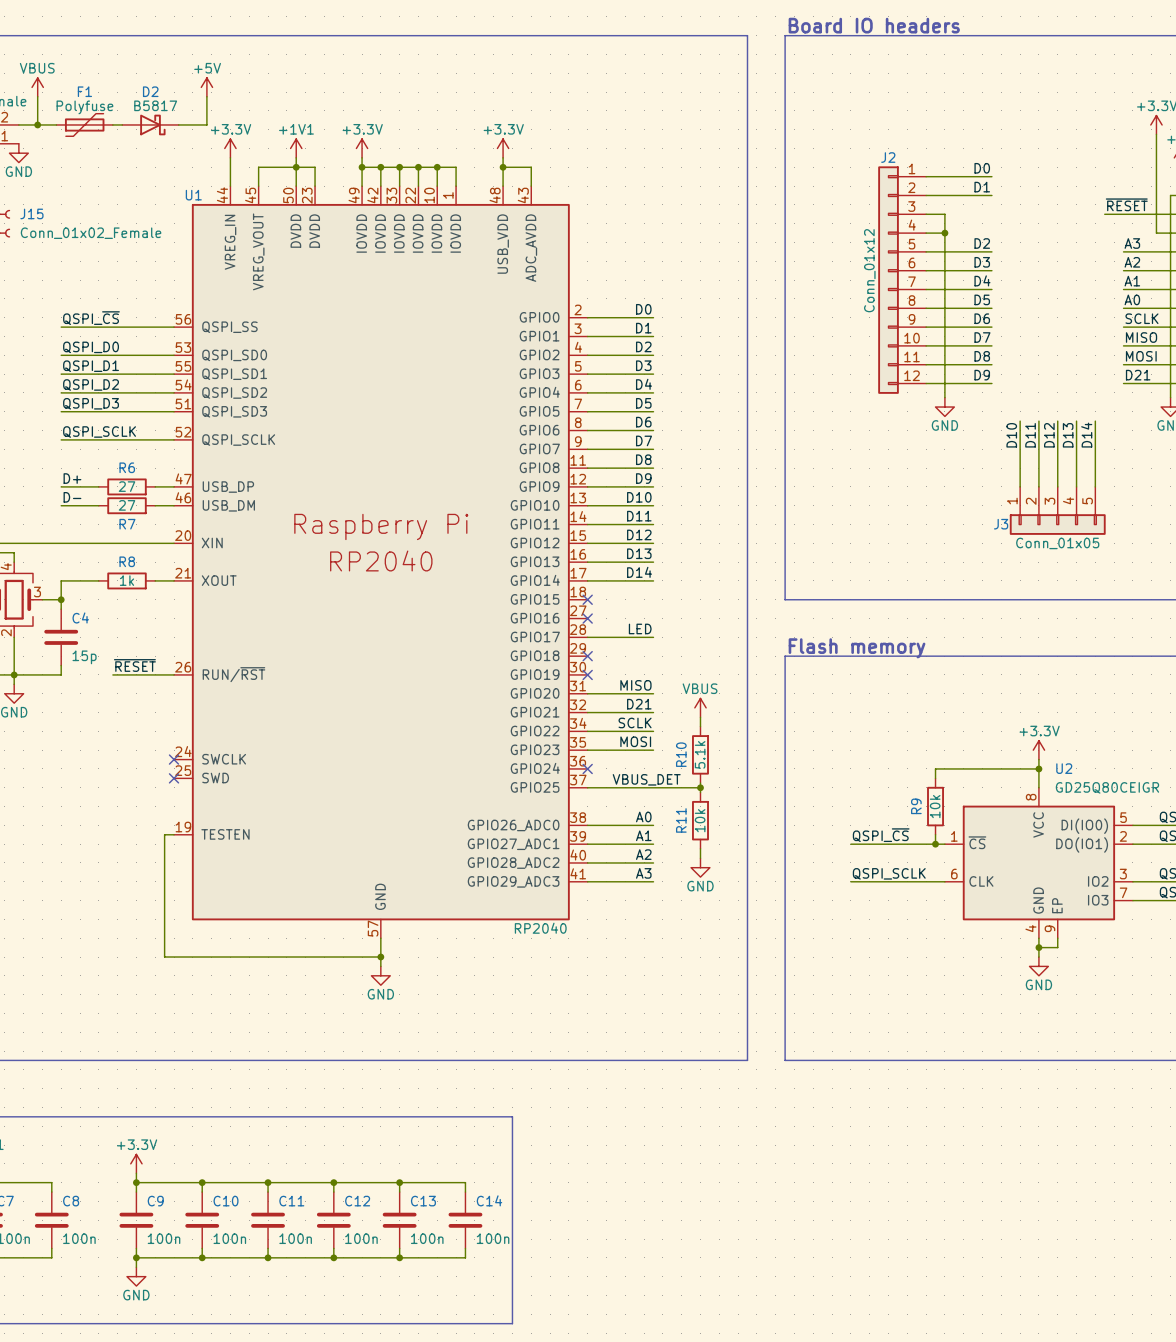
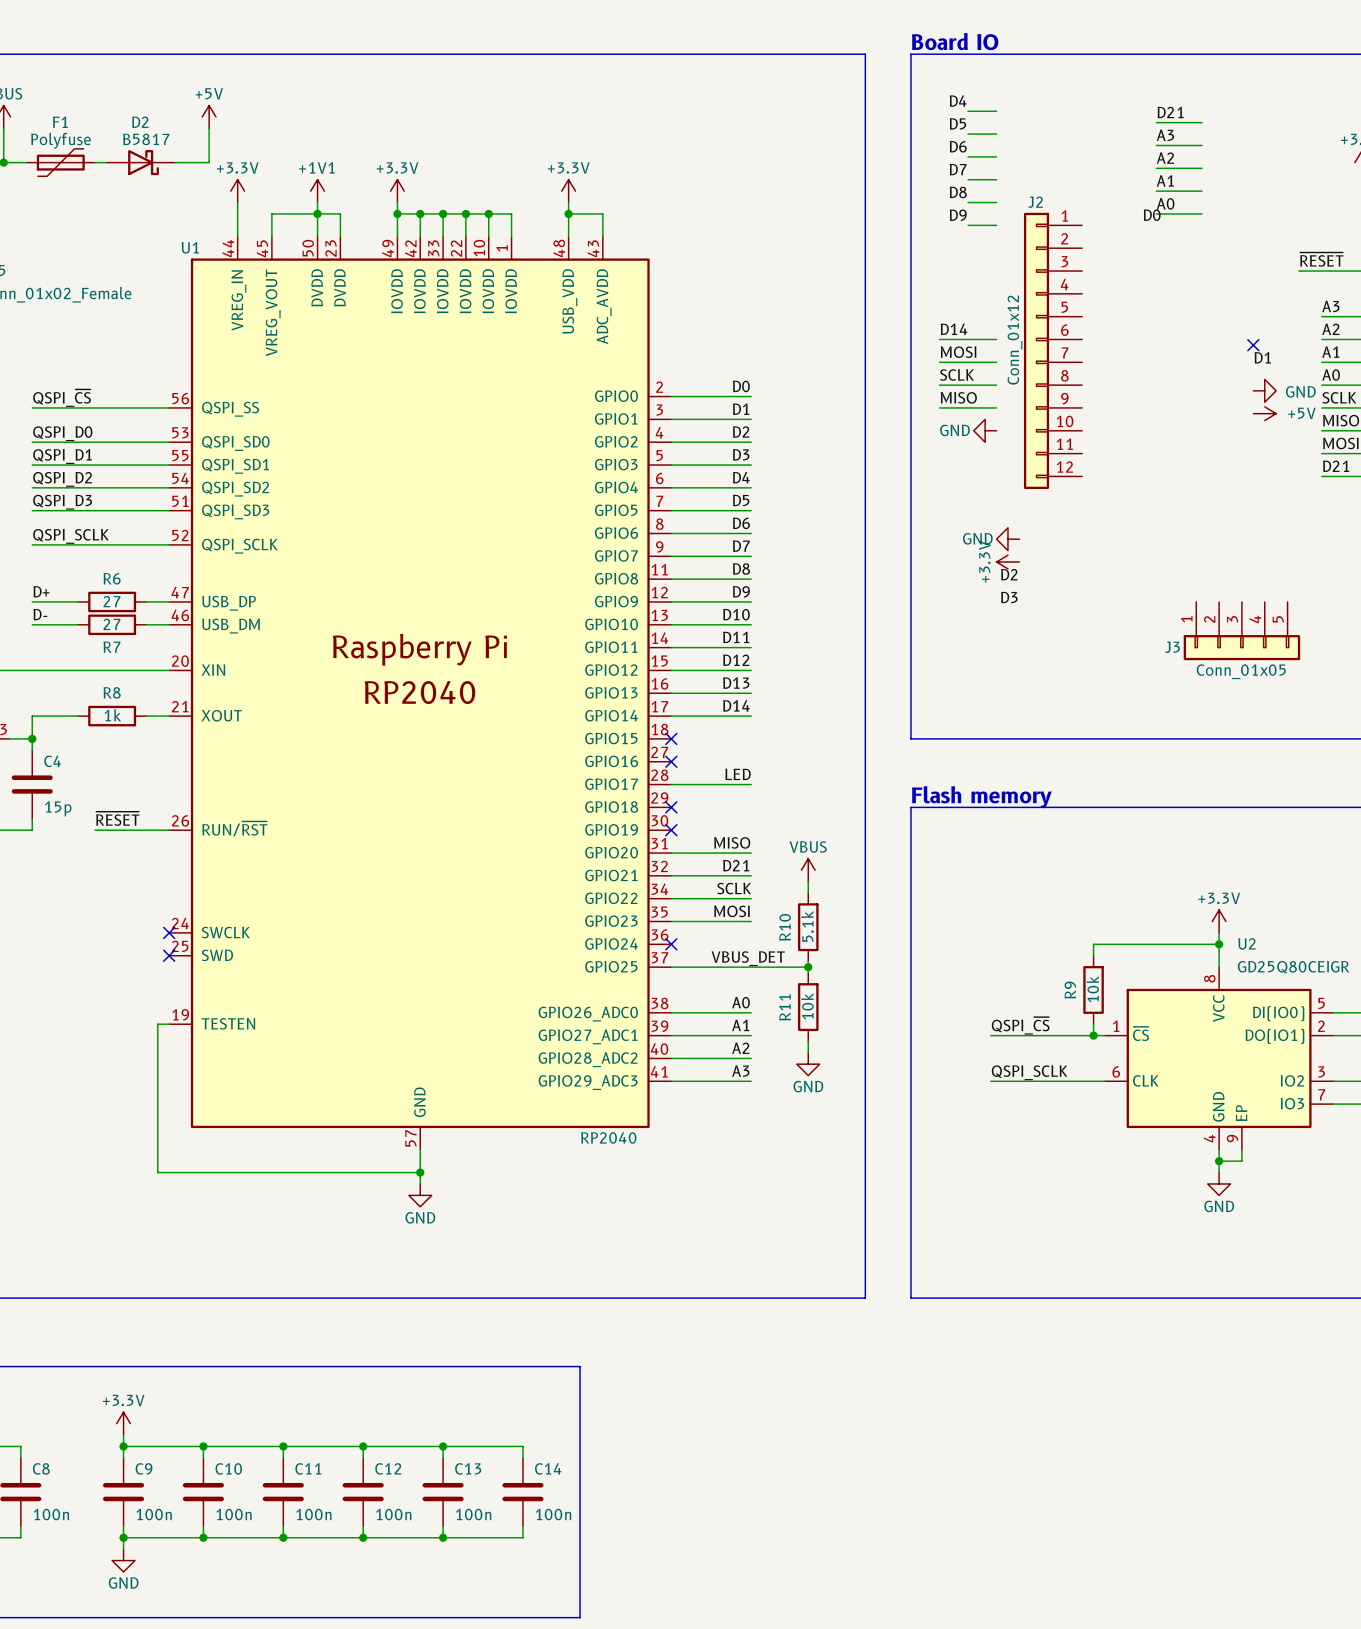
text: Board IO headers (874, 25) -> Board IO (955, 41)
label: none -> D4 (958, 101)
wire: none -> (968, 111) (996, 111)
label: none -> D21 (1170, 112)
wire: none -> (1156, 122) (1201, 122)
label: none -> D5 (957, 123)
wire: none -> (968, 134) (996, 134)
label: none -> A3 (1165, 135)
wire: none -> (1156, 145) (1201, 145)
label: none -> D6 (958, 146)
wire: none -> (968, 156) (996, 156)
label: none -> A2 (1165, 158)
wire: none -> (1156, 168) (1201, 168)
label: none -> D7 (958, 169)
wire: none -> (968, 179) (996, 179)
label: none -> A1 (1165, 180)
wire: none -> (1156, 191) (1201, 191)
label: none -> D8 (958, 192)
wire: none -> (968, 202) (996, 202)
label: none -> A0 (1165, 203)
wire: none -> (1156, 213) (1201, 213)
label: none -> D9 (958, 215)
wire: none -> (968, 225) (996, 225)
wire: (926, 176) (991, 176) -> none
label position: D1 (982, 187) -> D1 (1262, 357)
wire: (926, 195) (991, 195) -> none
wire: (926, 214) (944, 214) (944, 397) -> none
wire: (926, 233) (944, 233) -> none
junction: (944, 233) -> none
label: D2 (982, 243) -> none
wire: (926, 251) (991, 251) -> none
label: none -> D14 (954, 329)
label: D3 (982, 262) -> none
wire: none -> (939, 339) (996, 339)
wire: (926, 270) (991, 270) -> none
no-connect mark: none -> (1253, 345)
label: D4 (982, 280) -> none
label: none -> MOSI (958, 352)
wire: none -> (939, 362) (996, 362)
wire: (926, 289) (991, 289) -> none
label: none -> SCLK (957, 375)
label: D5 (982, 299) -> none
wire: none -> (939, 385) (996, 385)
wire: (926, 308) (991, 308) -> none
power symbol: none -> GND (1264, 390)
label: none -> MISO (958, 397)
label: D6 (982, 318) -> none
wire: none -> (939, 407) (996, 407)
wire: (926, 327) (991, 327) -> none
power symbol: none -> +5V (1264, 413)
label: D7 (982, 337) -> none
power symbol: none -> GND (985, 430)
wire: (926, 345) (991, 345) -> none
label: D8 (982, 356) -> none
wire: (926, 364) (991, 364) -> none
label: D9 (982, 375) -> none
wire: (926, 383) (991, 383) -> none
power symbol: GND (944, 407) -> none
wire: (1020, 421) (1020, 486) -> none
wire: (1038, 421) (1038, 486) -> none
wire: (1057, 421) (1057, 486) -> none
wire: (1076, 421) (1076, 486) -> none
wire: (1095, 421) (1095, 486) -> none
power symbol: none -> GND (1007, 539)
label: D10 (1011, 435) -> none
label: D11 (1030, 435) -> none
label: D12 (1049, 435) -> none
label: D13 (1068, 435) -> none
label: D14 (1086, 435) -> none
power symbol: none -> +3.3V (1007, 562)
label: none -> D2 (1009, 574)
label: none -> D3 (1009, 597)

